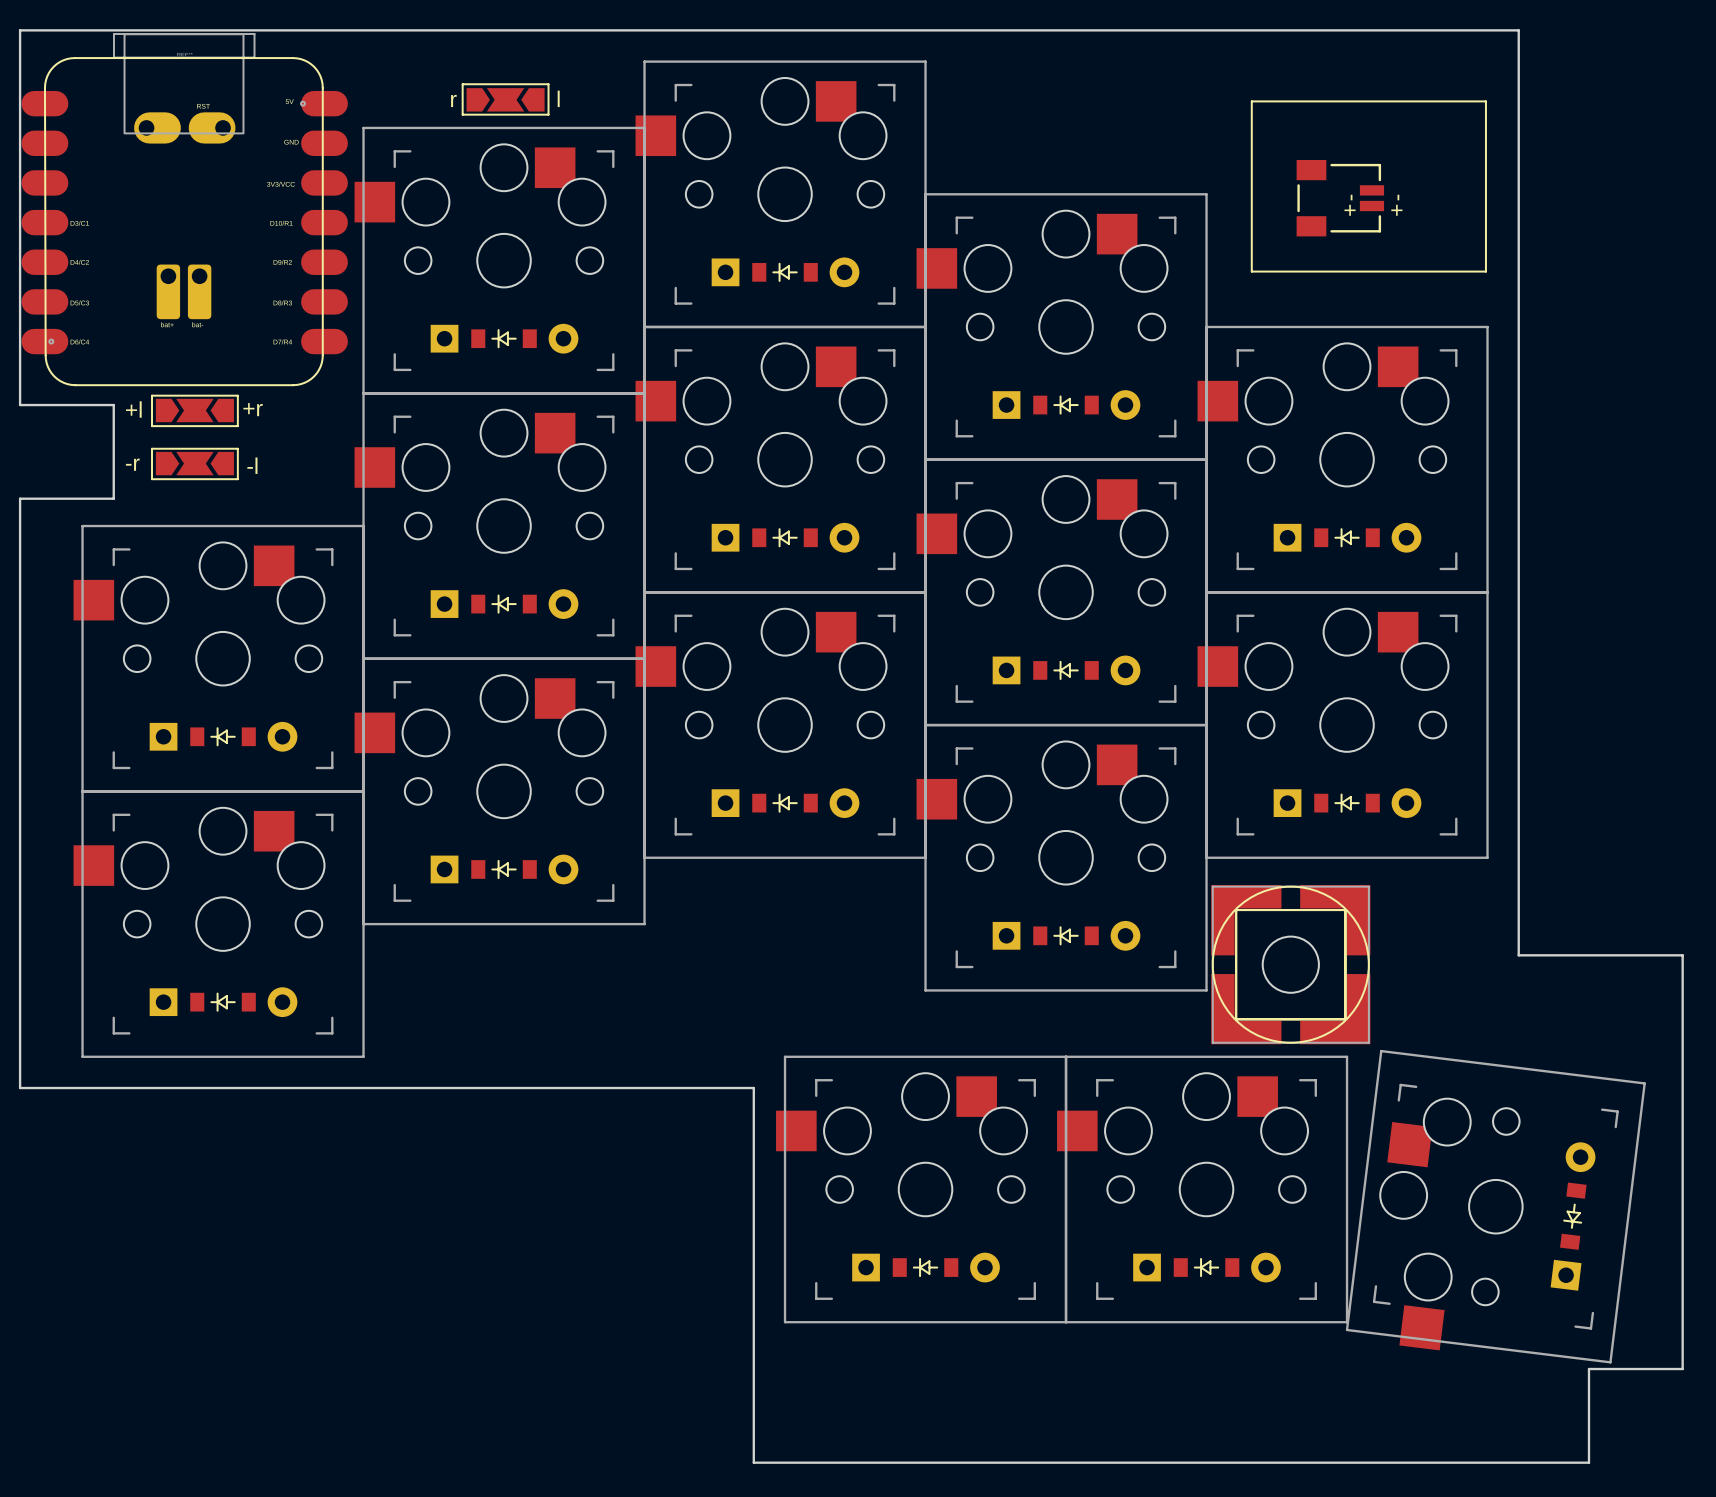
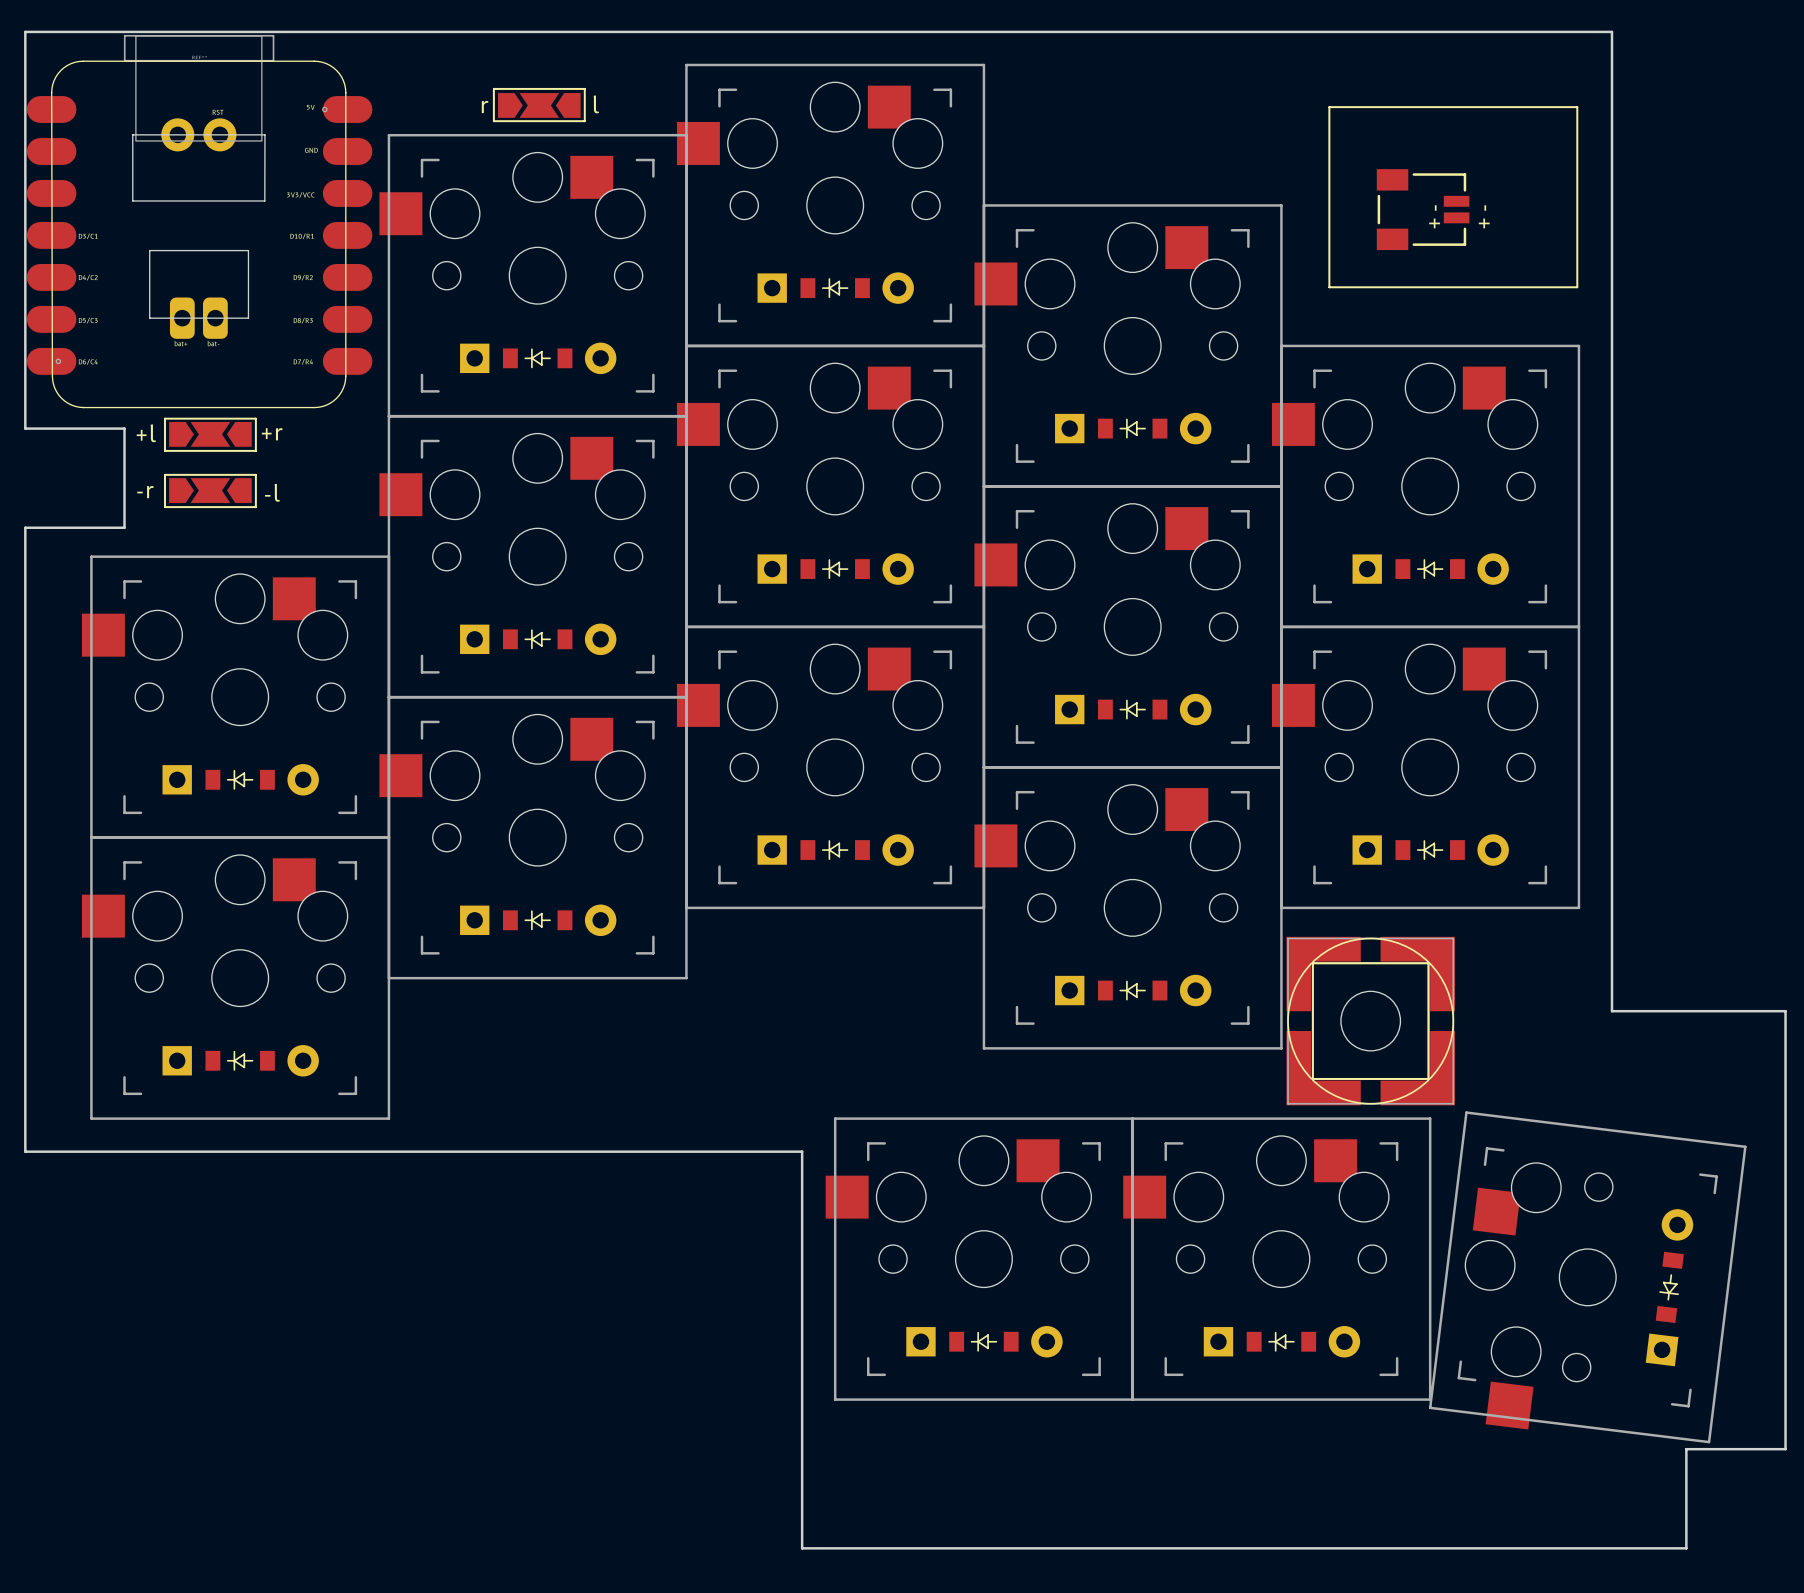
part footprint: [21, 33, 348, 386] -> [26, 34, 373, 408]

